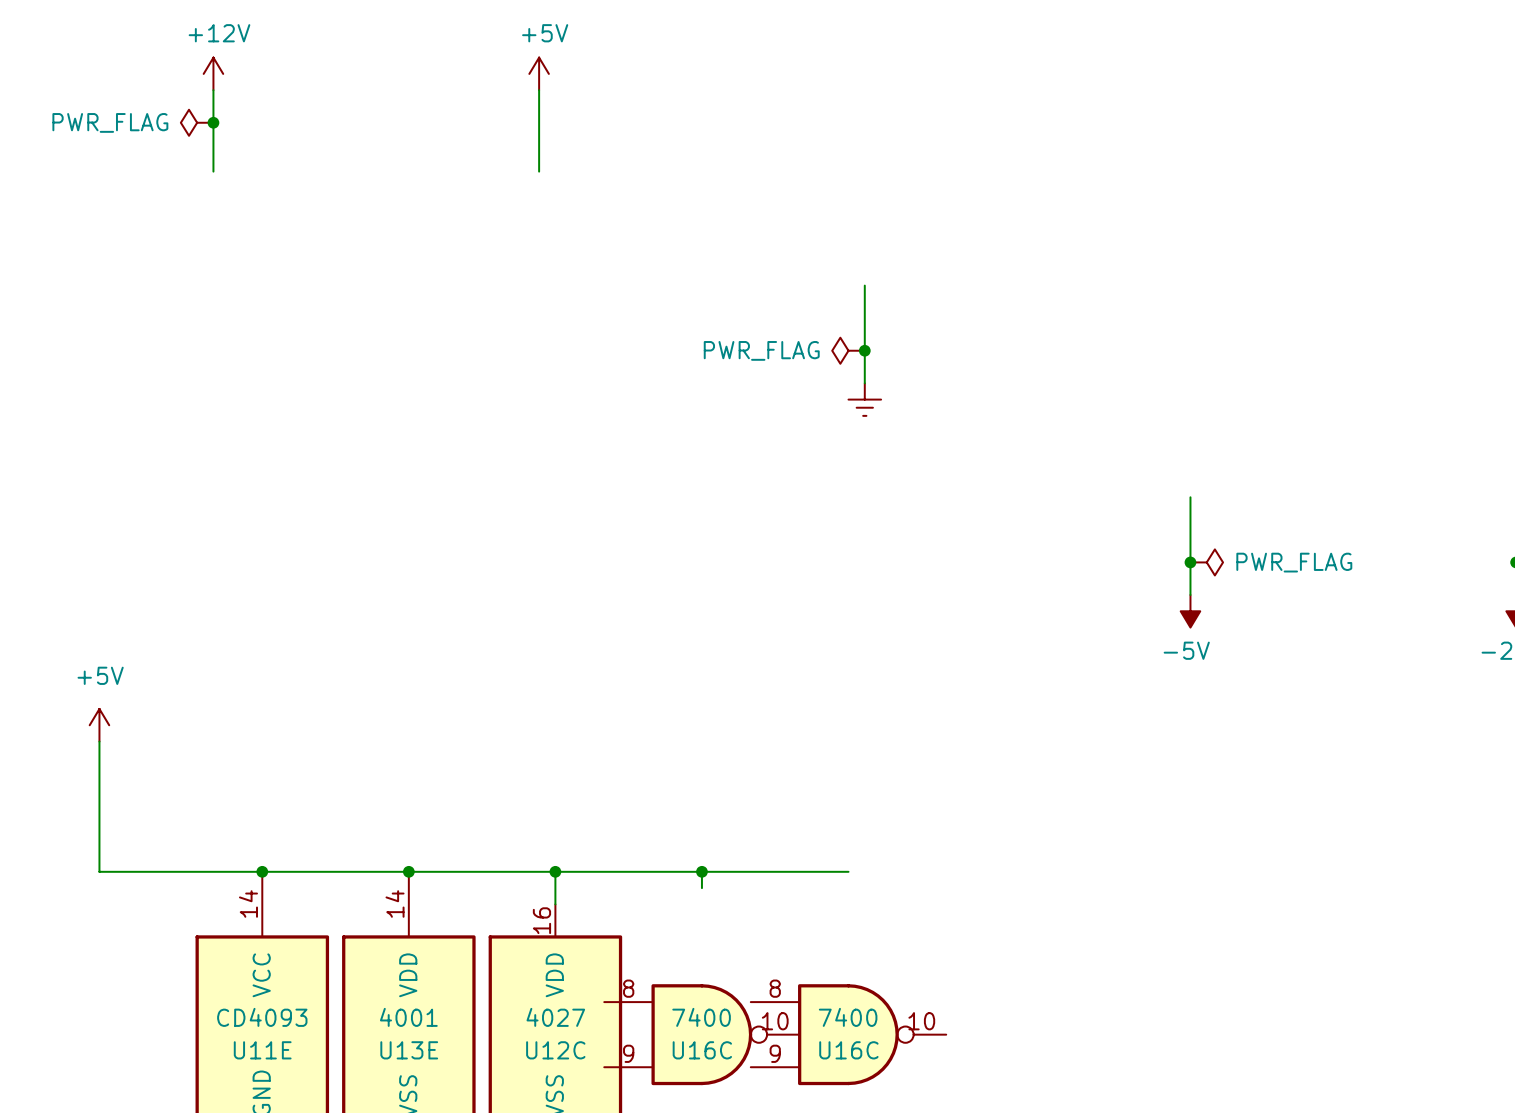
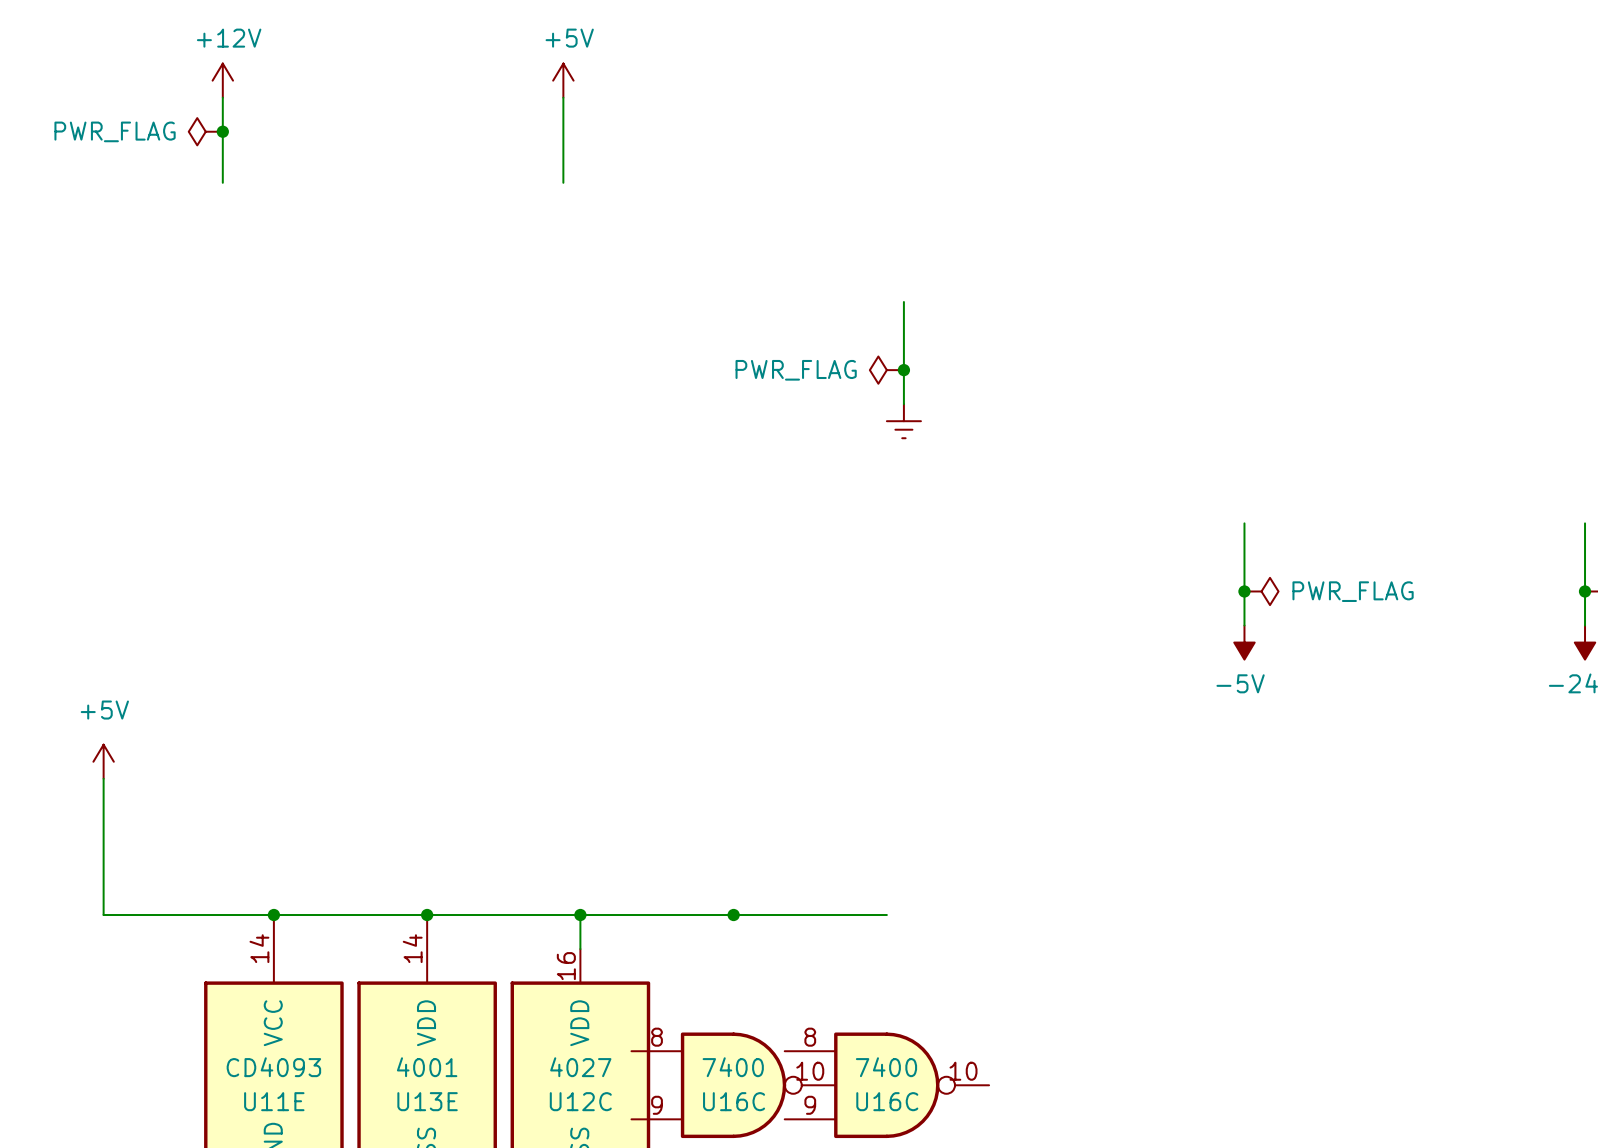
wire: (701, 871) (701, 888) -> none

